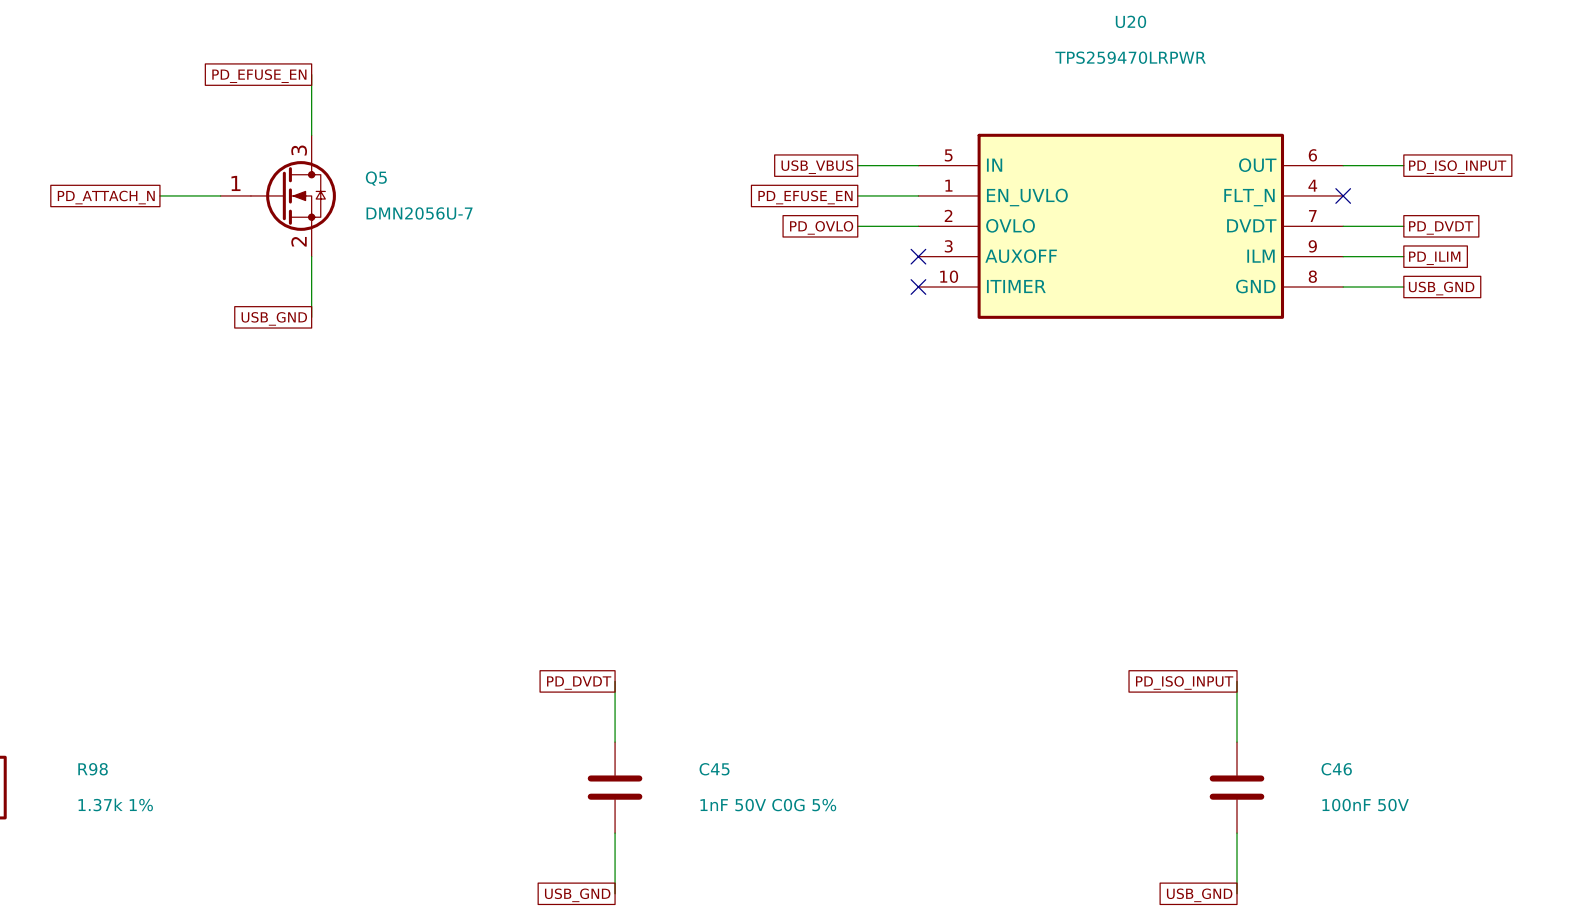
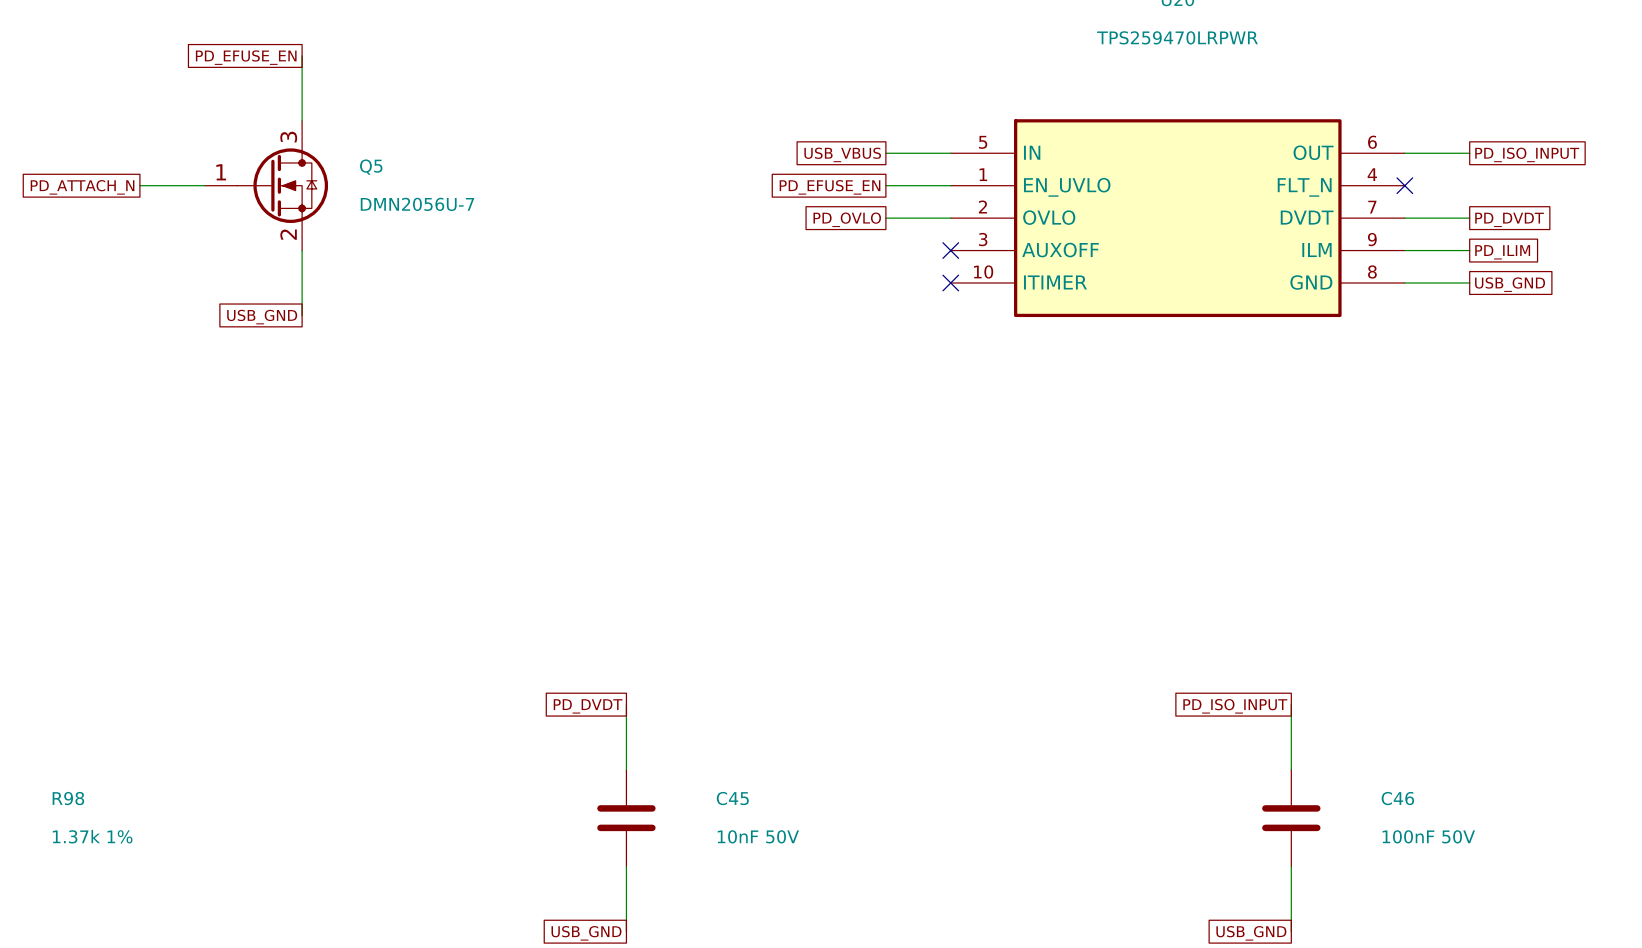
C45 value: 1nF 50V C0G 5% (768, 805) -> 10nF 50V (758, 836)

